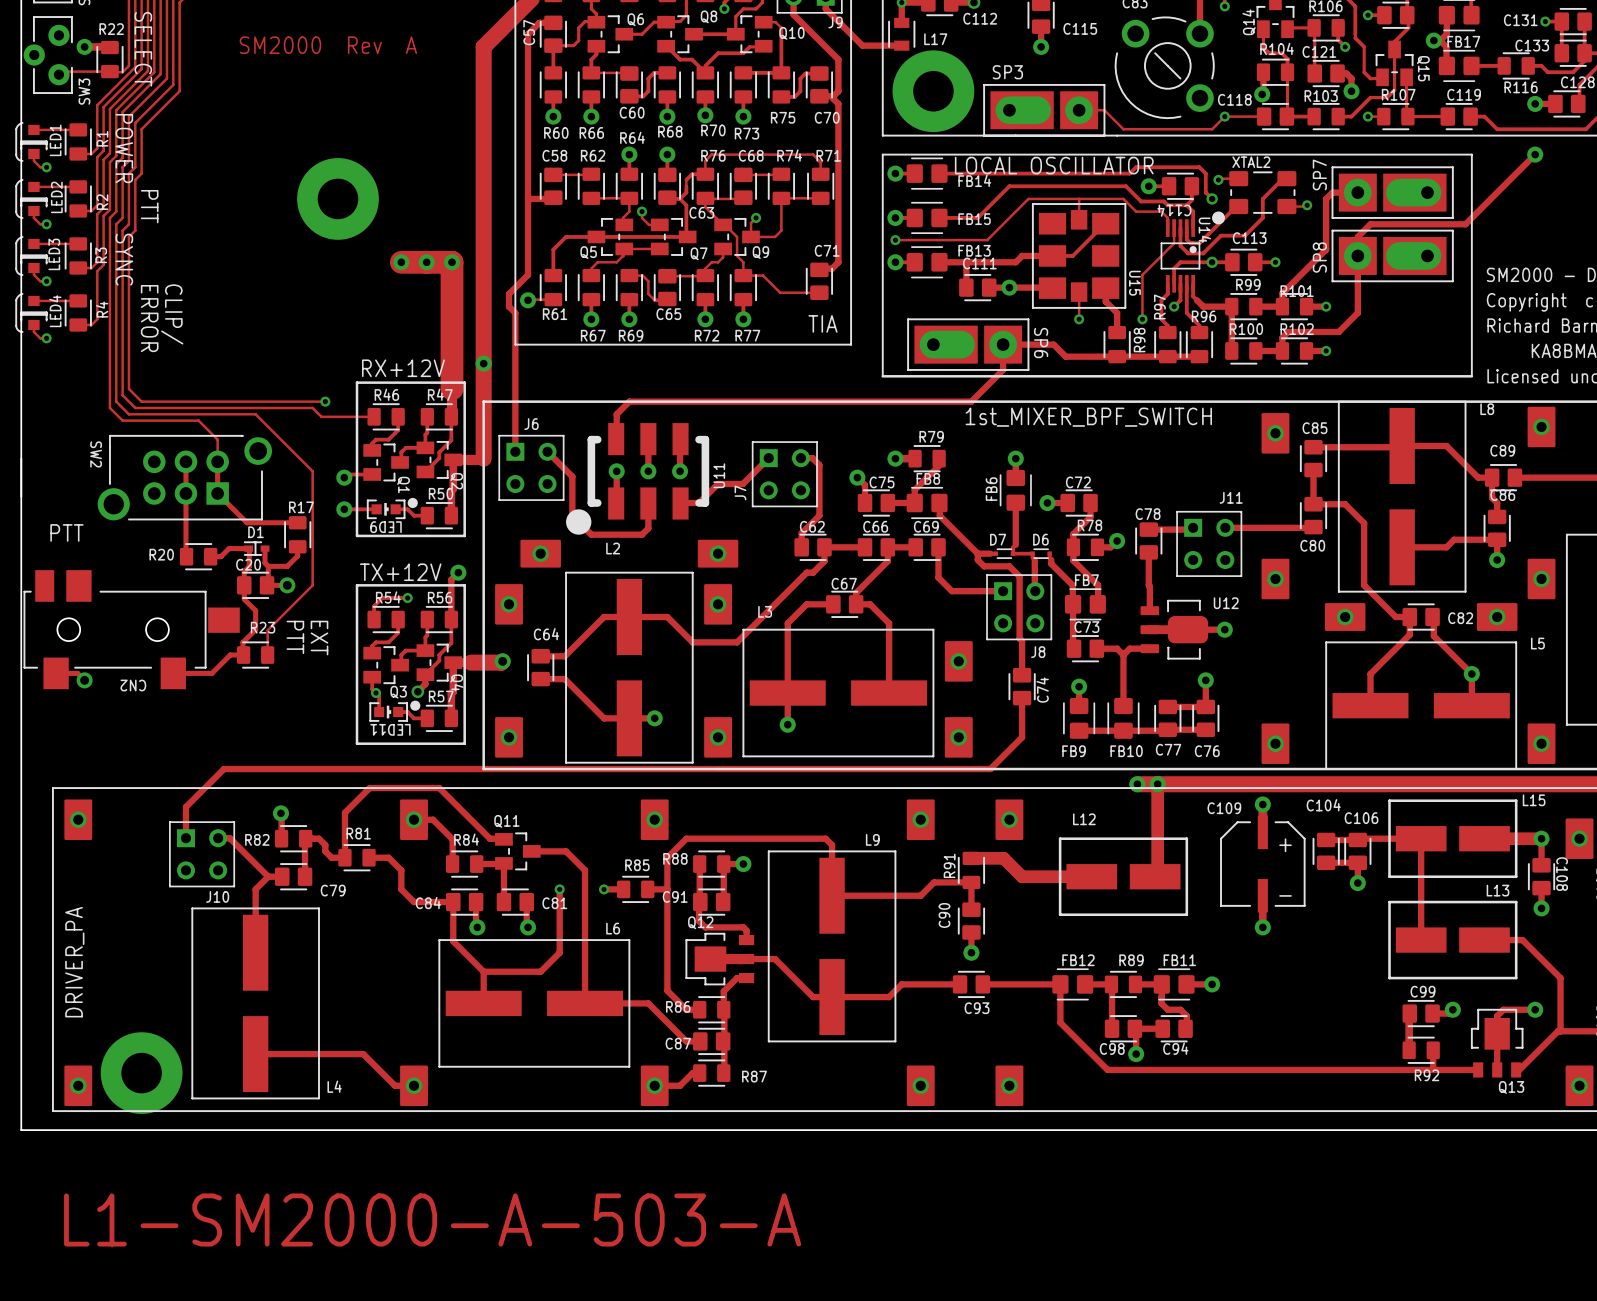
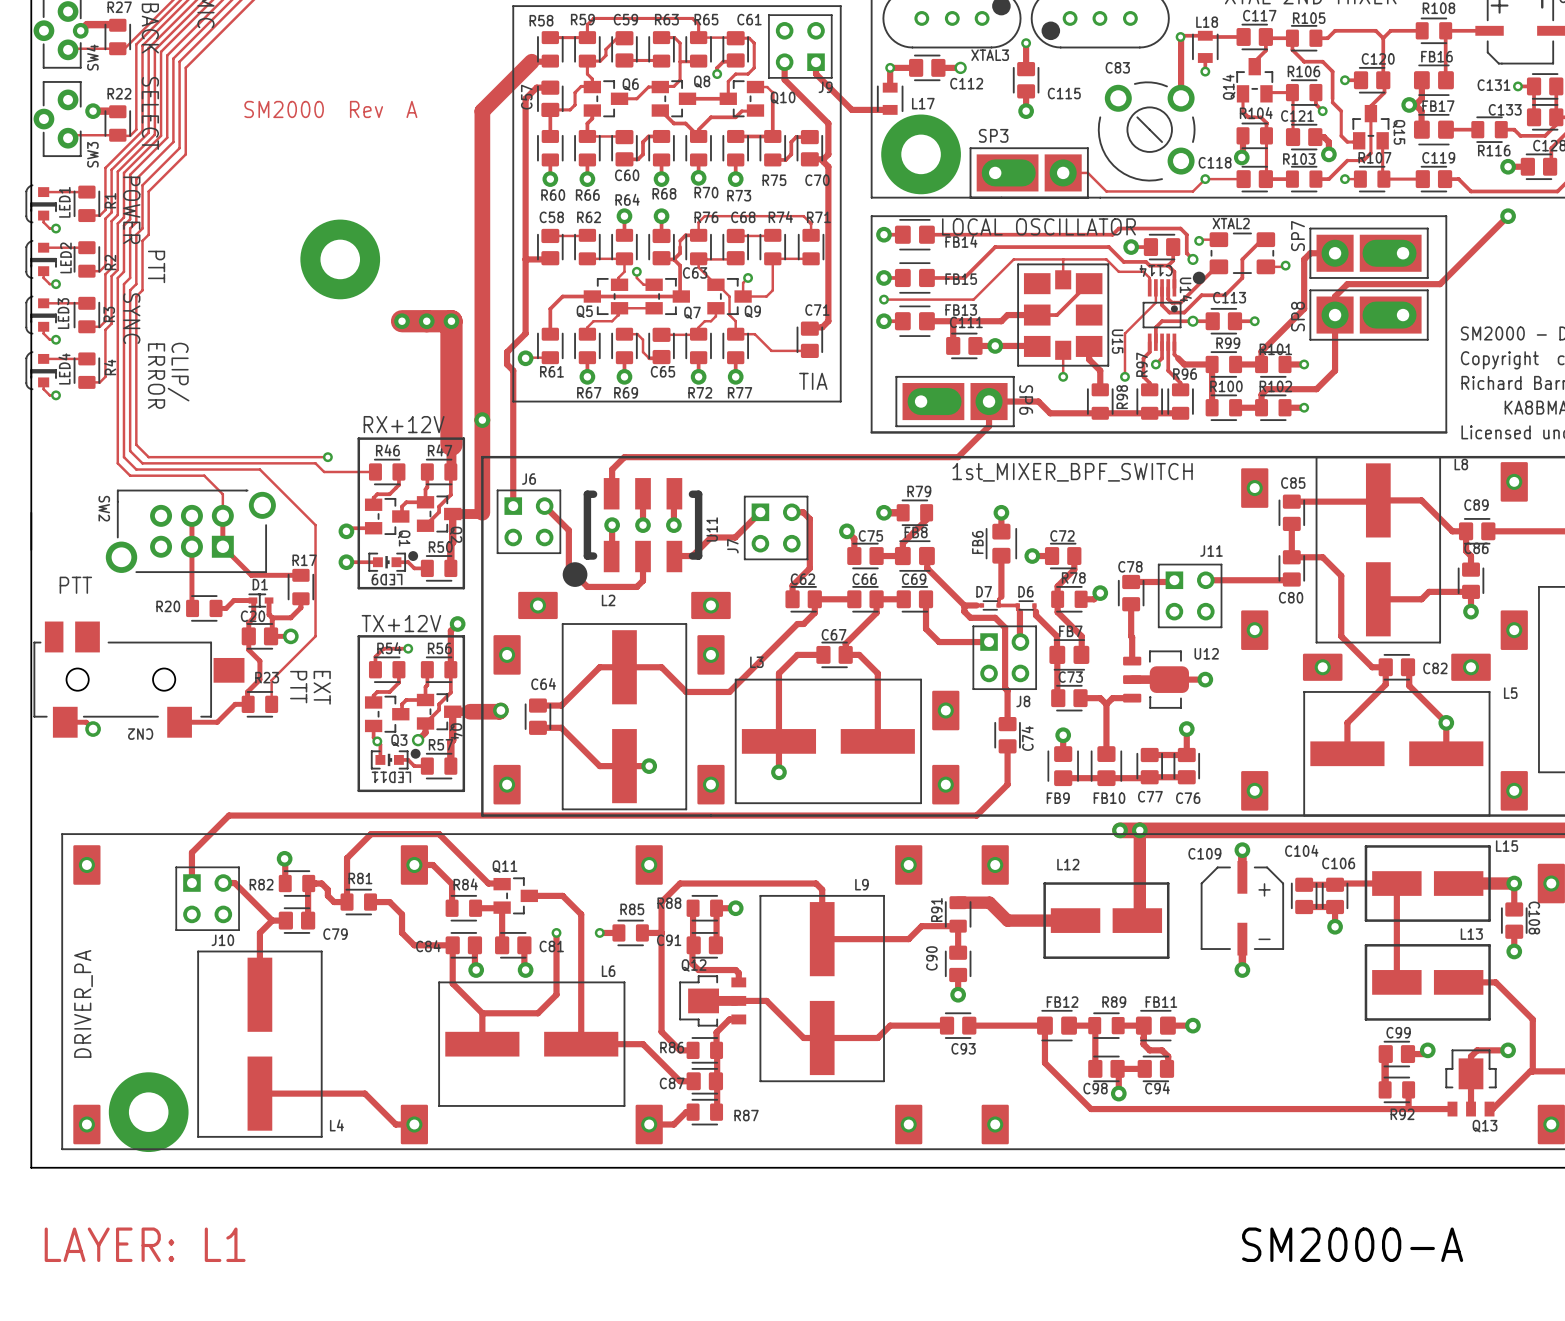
text: none -> LAYER: L1 (145, 1244)
text: none -> SM2000-A (1352, 1244)
text: L1-SM2000-A-503-A (432, 1219) -> none

